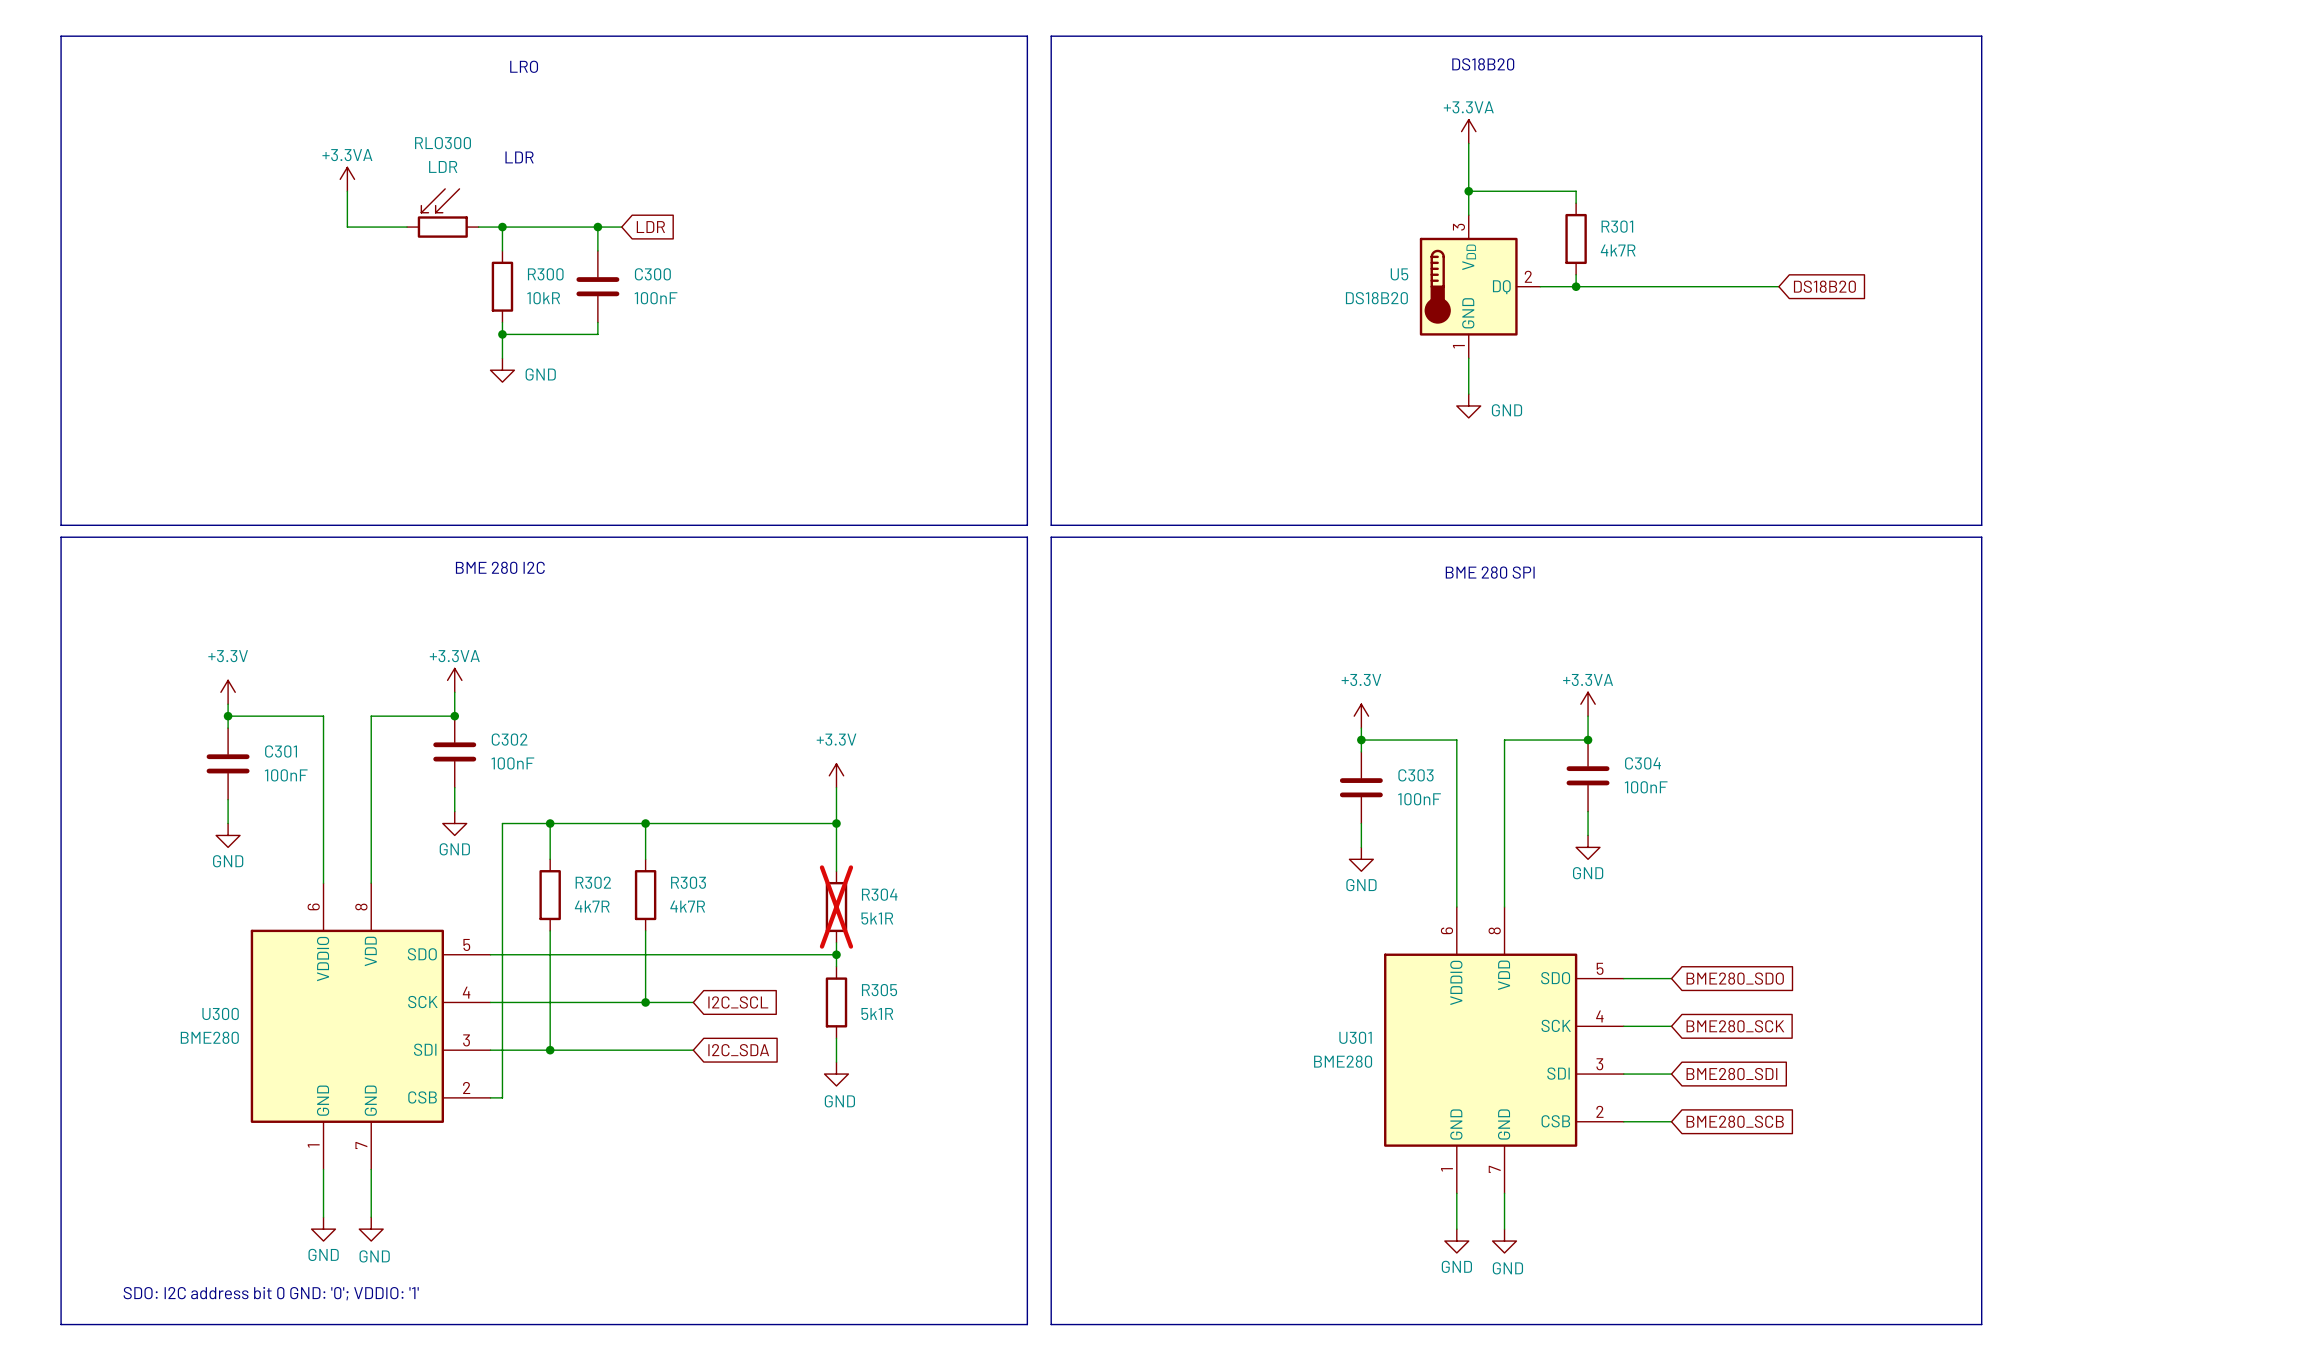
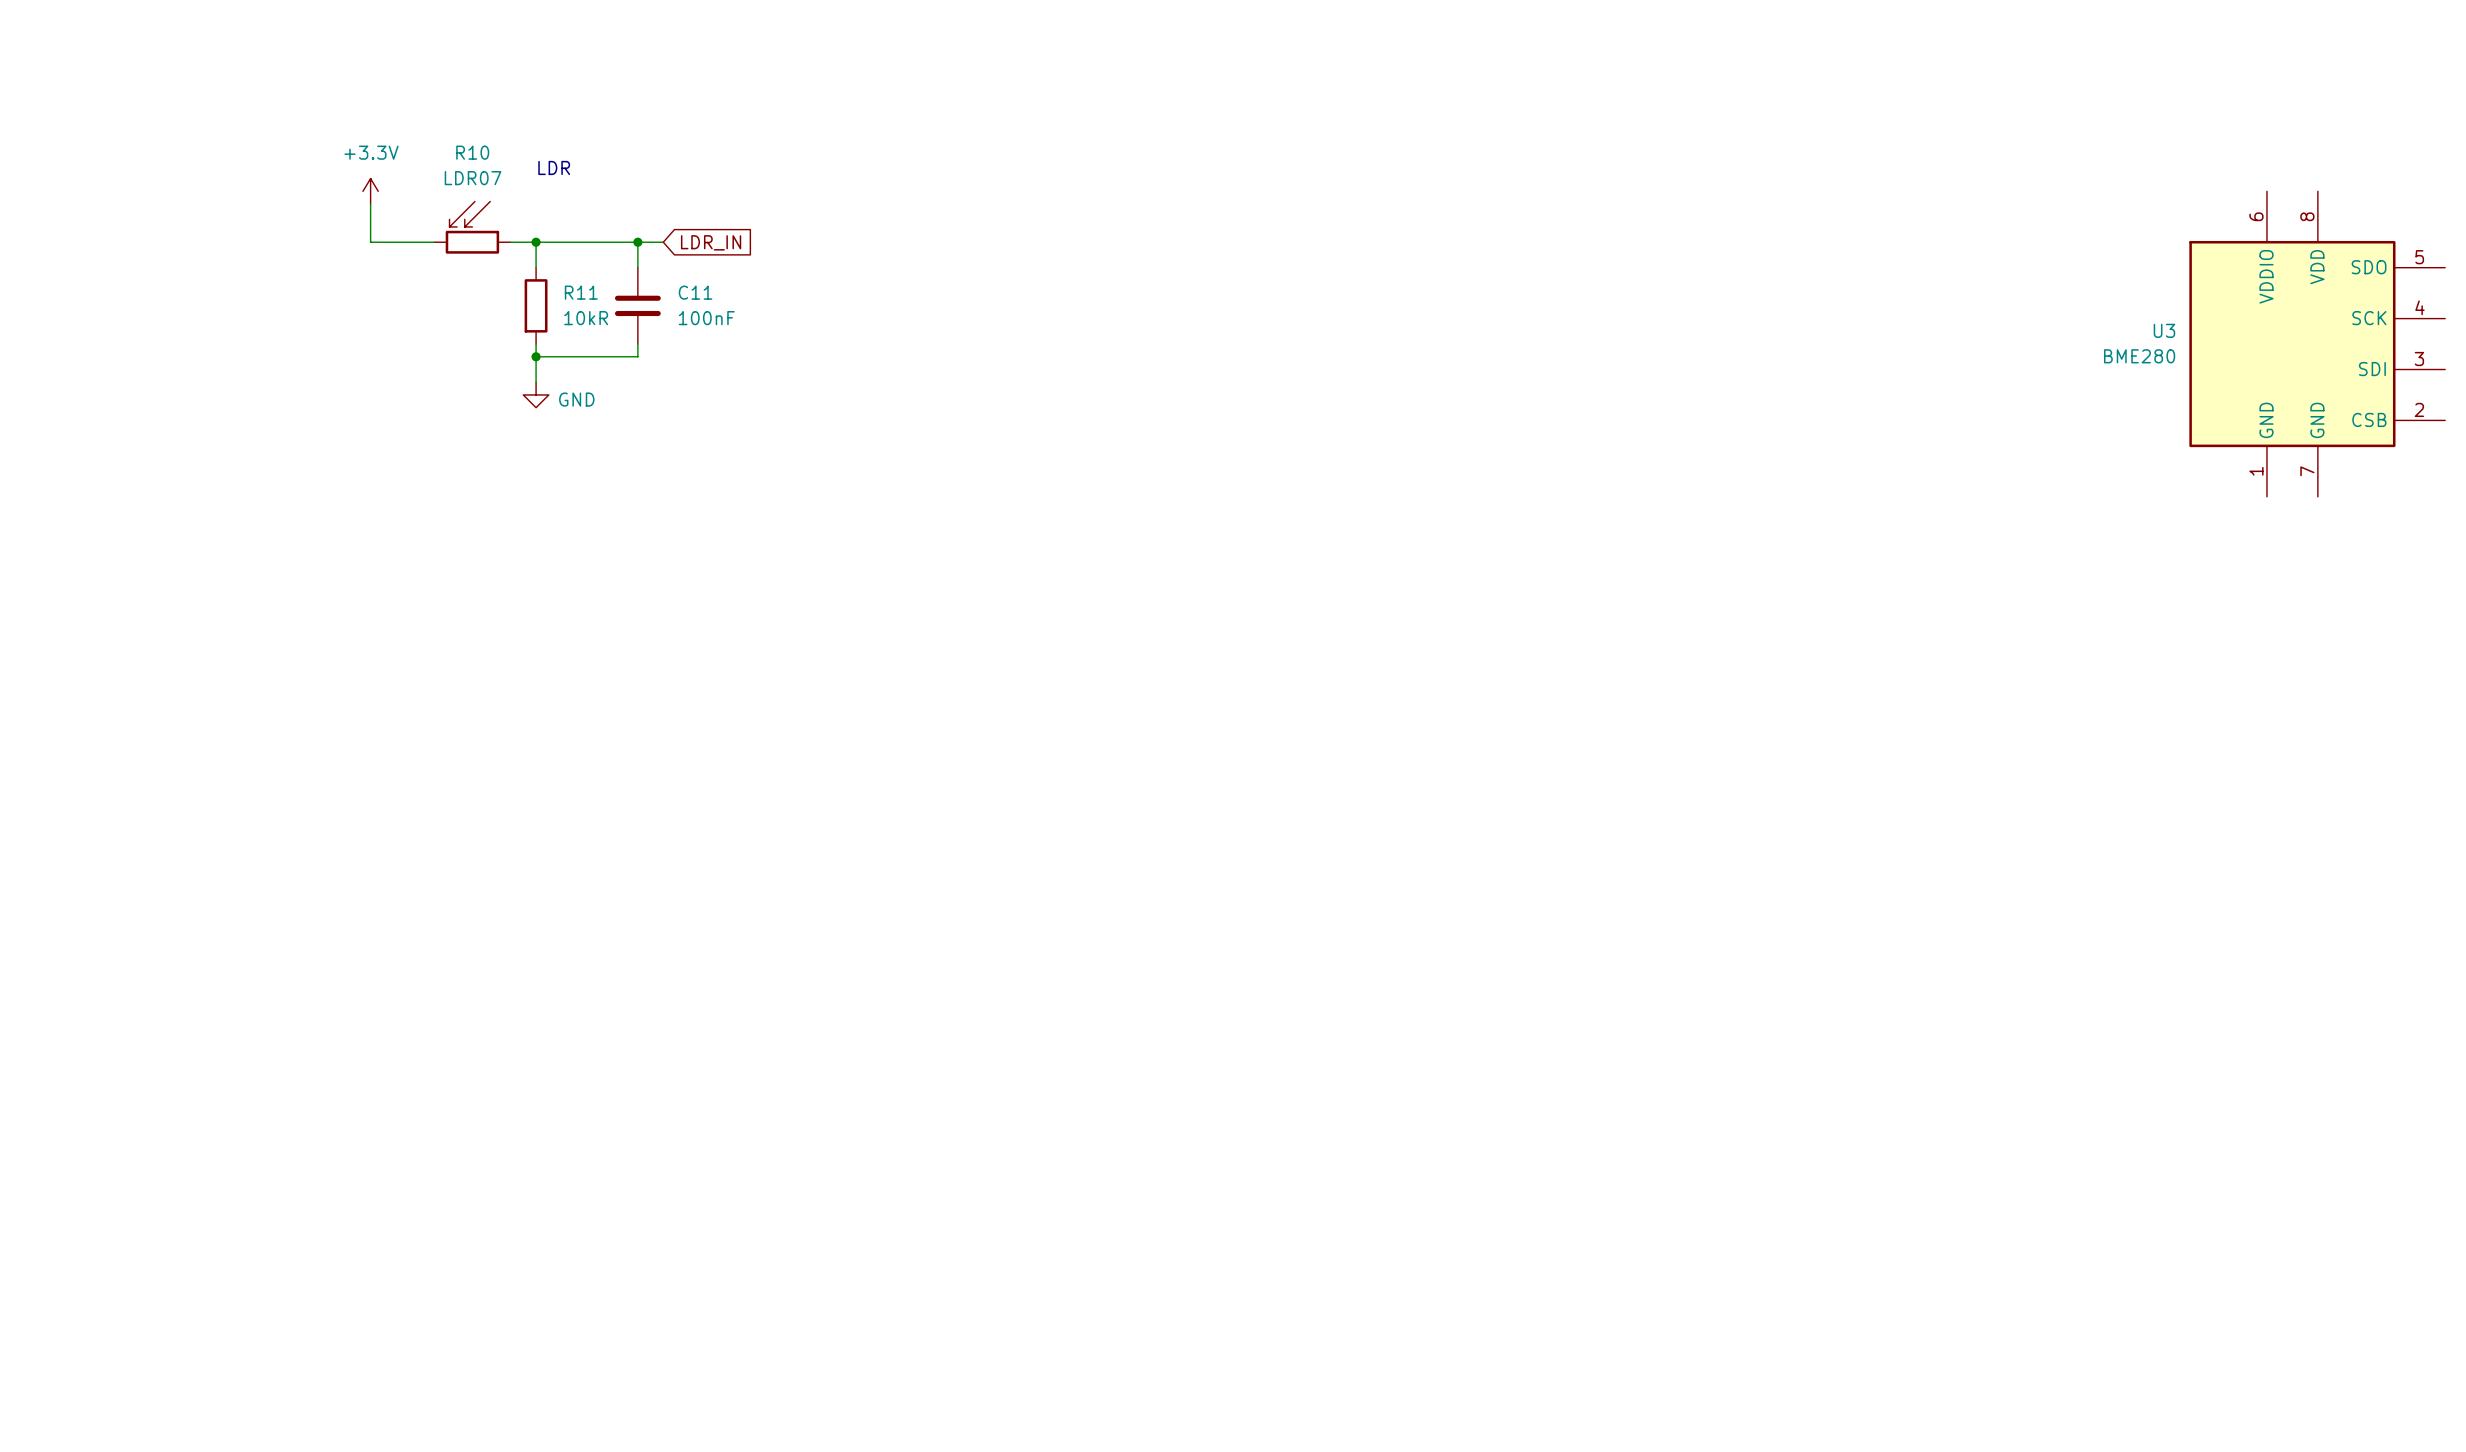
line: (61, 36) (61, 525) (1027, 525) (1027, 36) (61, 36) -> none
line: (1051, 36) (1981, 36) (1981, 525) (1051, 525) (1051, 36) -> none
text: DS18B20 (1483, 64) -> none
text: LRO (524, 66) -> none
power symbol: +3.3VA (1468, 131) -> none
RLO300 name: RLO300 (443, 143) -> R10 (472, 152)
wire: (1468, 143) (1468, 215) -> none
RLO300 value: LDR (443, 166) -> LDR07 (473, 178)
power symbol: +3.3VA (347, 179) -> +3.3V (370, 191)
wire: (1468, 191) (1576, 191) (1576, 203) -> none
junction: (1468, 191) -> none
global label: LDR (650, 227) -> LDR_IN (711, 242)
R301: 4k7R (1576, 238) -> none
R300 name: R300 (545, 274) -> R11 (581, 292)
C300 name: C300 (652, 274) -> C11 (695, 292)
wire: (1576, 274) (1576, 286) -> none
U5: DS18B20 (1480, 286) -> none
wire: (1540, 286) (1778, 286) -> none
junction: (1576, 286) -> none
global label: DS18B20 (1824, 286) -> none
U3: none -> BME280 (2317, 344)
wire: (1468, 358) (1468, 394) -> none
power symbol: GND (1468, 405) -> none
line: (61, 537) (1027, 537) (1027, 1324) (61, 1324) (61, 537) -> none
line: (1051, 537) (1981, 537) (1981, 1324) (1051, 1324) (1051, 537) -> none
text: BME 280 I2C (500, 567) -> none
text: BME 280 SPI (1490, 572) -> none
power symbol: +3.3VA (454, 680) -> none
power symbol: +3.3V (228, 692) -> none
wire: (454, 692) (454, 716) (371, 716) (371, 883) -> none
wire: (228, 704) (228, 728) -> none
power symbol: +3.3VA (1588, 704) -> none
wire: (228, 716) (323, 716) (323, 883) -> none
junction: (228, 716) -> none
junction: (454, 716) -> none
power symbol: +3.3V (1361, 716) -> none
wire: (1588, 716) (1588, 740) (1504, 740) (1504, 907) -> none
wire: (1361, 728) (1361, 751) -> none
wire: (1361, 740) (1456, 740) (1456, 907) -> none
junction: (1361, 740) -> none
junction: (1588, 740) -> none
C302: 100nF (454, 751) -> none
C301: 100nF (228, 763) -> none
power symbol: +3.3V (836, 775) -> none
C304: 100nF (1588, 775) -> none
wire: (454, 787) (454, 811) -> none
wire: (836, 787) (836, 871) -> none
C303: 100nF (1361, 787) -> none
wire: (228, 799) (228, 823) -> none
wire: (1588, 811) (1588, 835) -> none
power symbol: GND (454, 823) -> none
wire: (550, 823) (550, 859) -> none
junction: (550, 823) -> none
wire: (645, 823) (645, 859) -> none
junction: (645, 823) -> none
wire: (836, 823) (502, 823) (502, 1097) (490, 1097) -> none
junction: (836, 823) -> none
wire: (1361, 823) (1361, 847) -> none
power symbol: GND (228, 835) -> none
power symbol: GND (1588, 847) -> none
power symbol: GND (1361, 859) -> none
R302: 4k7R (550, 895) -> none
R303: 4k7R (645, 895) -> none
R304: 5k1R (836, 907) -> none
wire: (550, 930) (550, 1050) -> none
wire: (645, 930) (645, 1002) -> none
wire: (836, 942) (836, 966) -> none
wire: (490, 954) (836, 954) -> none
junction: (836, 954) -> none
wire: (1623, 978) (1671, 978) -> none
global label: BME280_SDO (1735, 978) -> none
wire: (490, 1002) (693, 1002) -> none
junction: (645, 1002) -> none
global label: I2C_SCL (738, 1002) -> none
R305: 5k1R (836, 1002) -> none
U300: BME280 (370, 1026) -> none
wire: (1623, 1026) (1671, 1026) -> none
global label: BME280_SCK (1735, 1026) -> none
wire: (836, 1038) (836, 1062) -> none
wire: (490, 1050) (693, 1050) -> none
junction: (550, 1050) -> none
global label: I2C_SDA (738, 1050) -> none
U301: BME280 (1503, 1050) -> none
power symbol: GND (836, 1074) -> none
wire: (1623, 1074) (1671, 1074) -> none
global label: BME280_SDI (1731, 1074) -> none
wire: (1623, 1121) (1671, 1121) -> none
global label: BME280_SCB (1735, 1121) -> none
wire: (323, 1169) (323, 1217) -> none
wire: (371, 1169) (371, 1217) -> none
wire: (1456, 1193) (1456, 1229) -> none
wire: (1504, 1193) (1504, 1229) -> none
power symbol: GND (323, 1229) -> none
power symbol: GND (371, 1229) -> none
power symbol: GND (1456, 1241) -> none
power symbol: GND (1504, 1241) -> none
text: SDO: I2C address bit 0 GND: '0'; VDDIO: '1' (271, 1293) -> none

